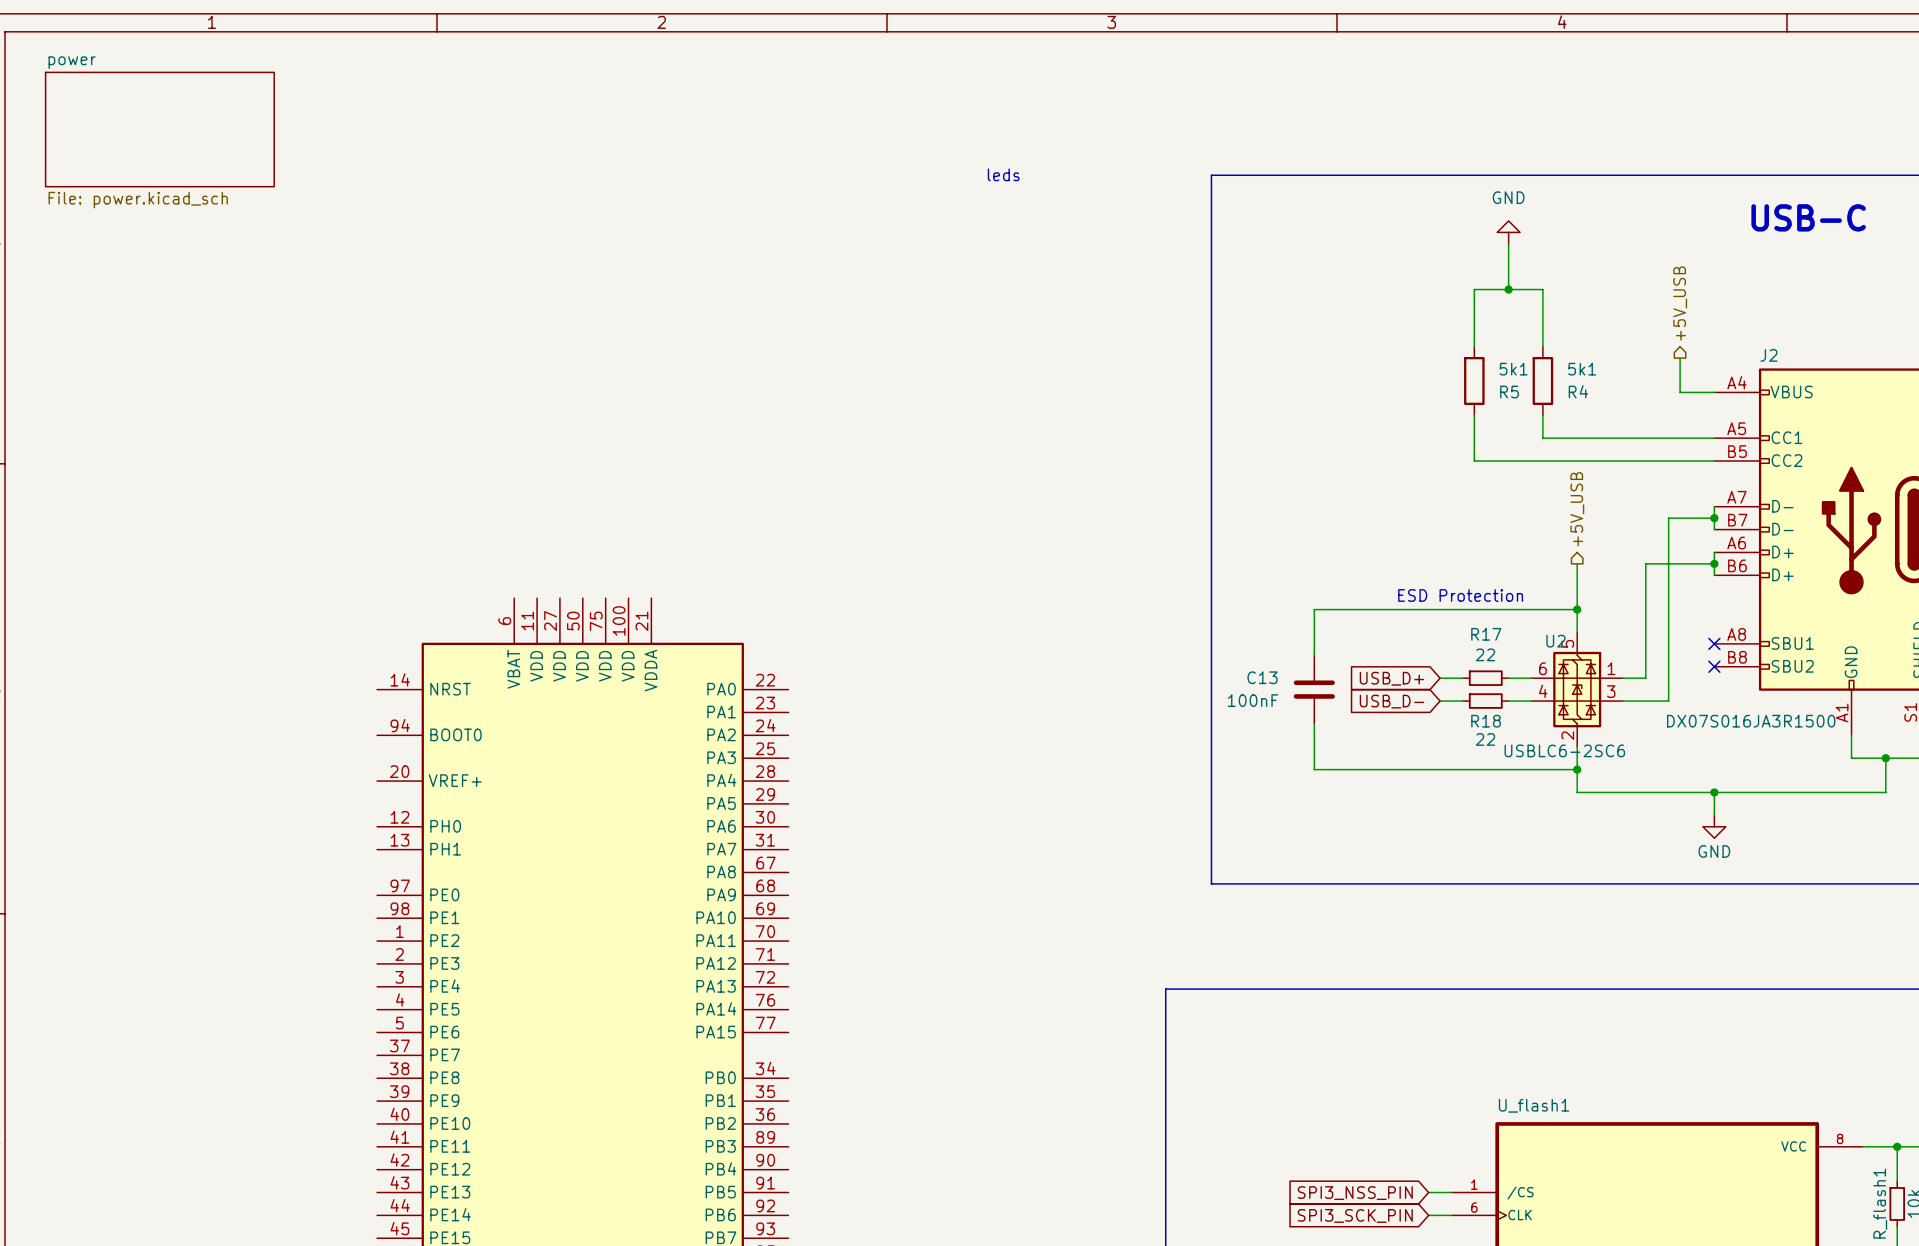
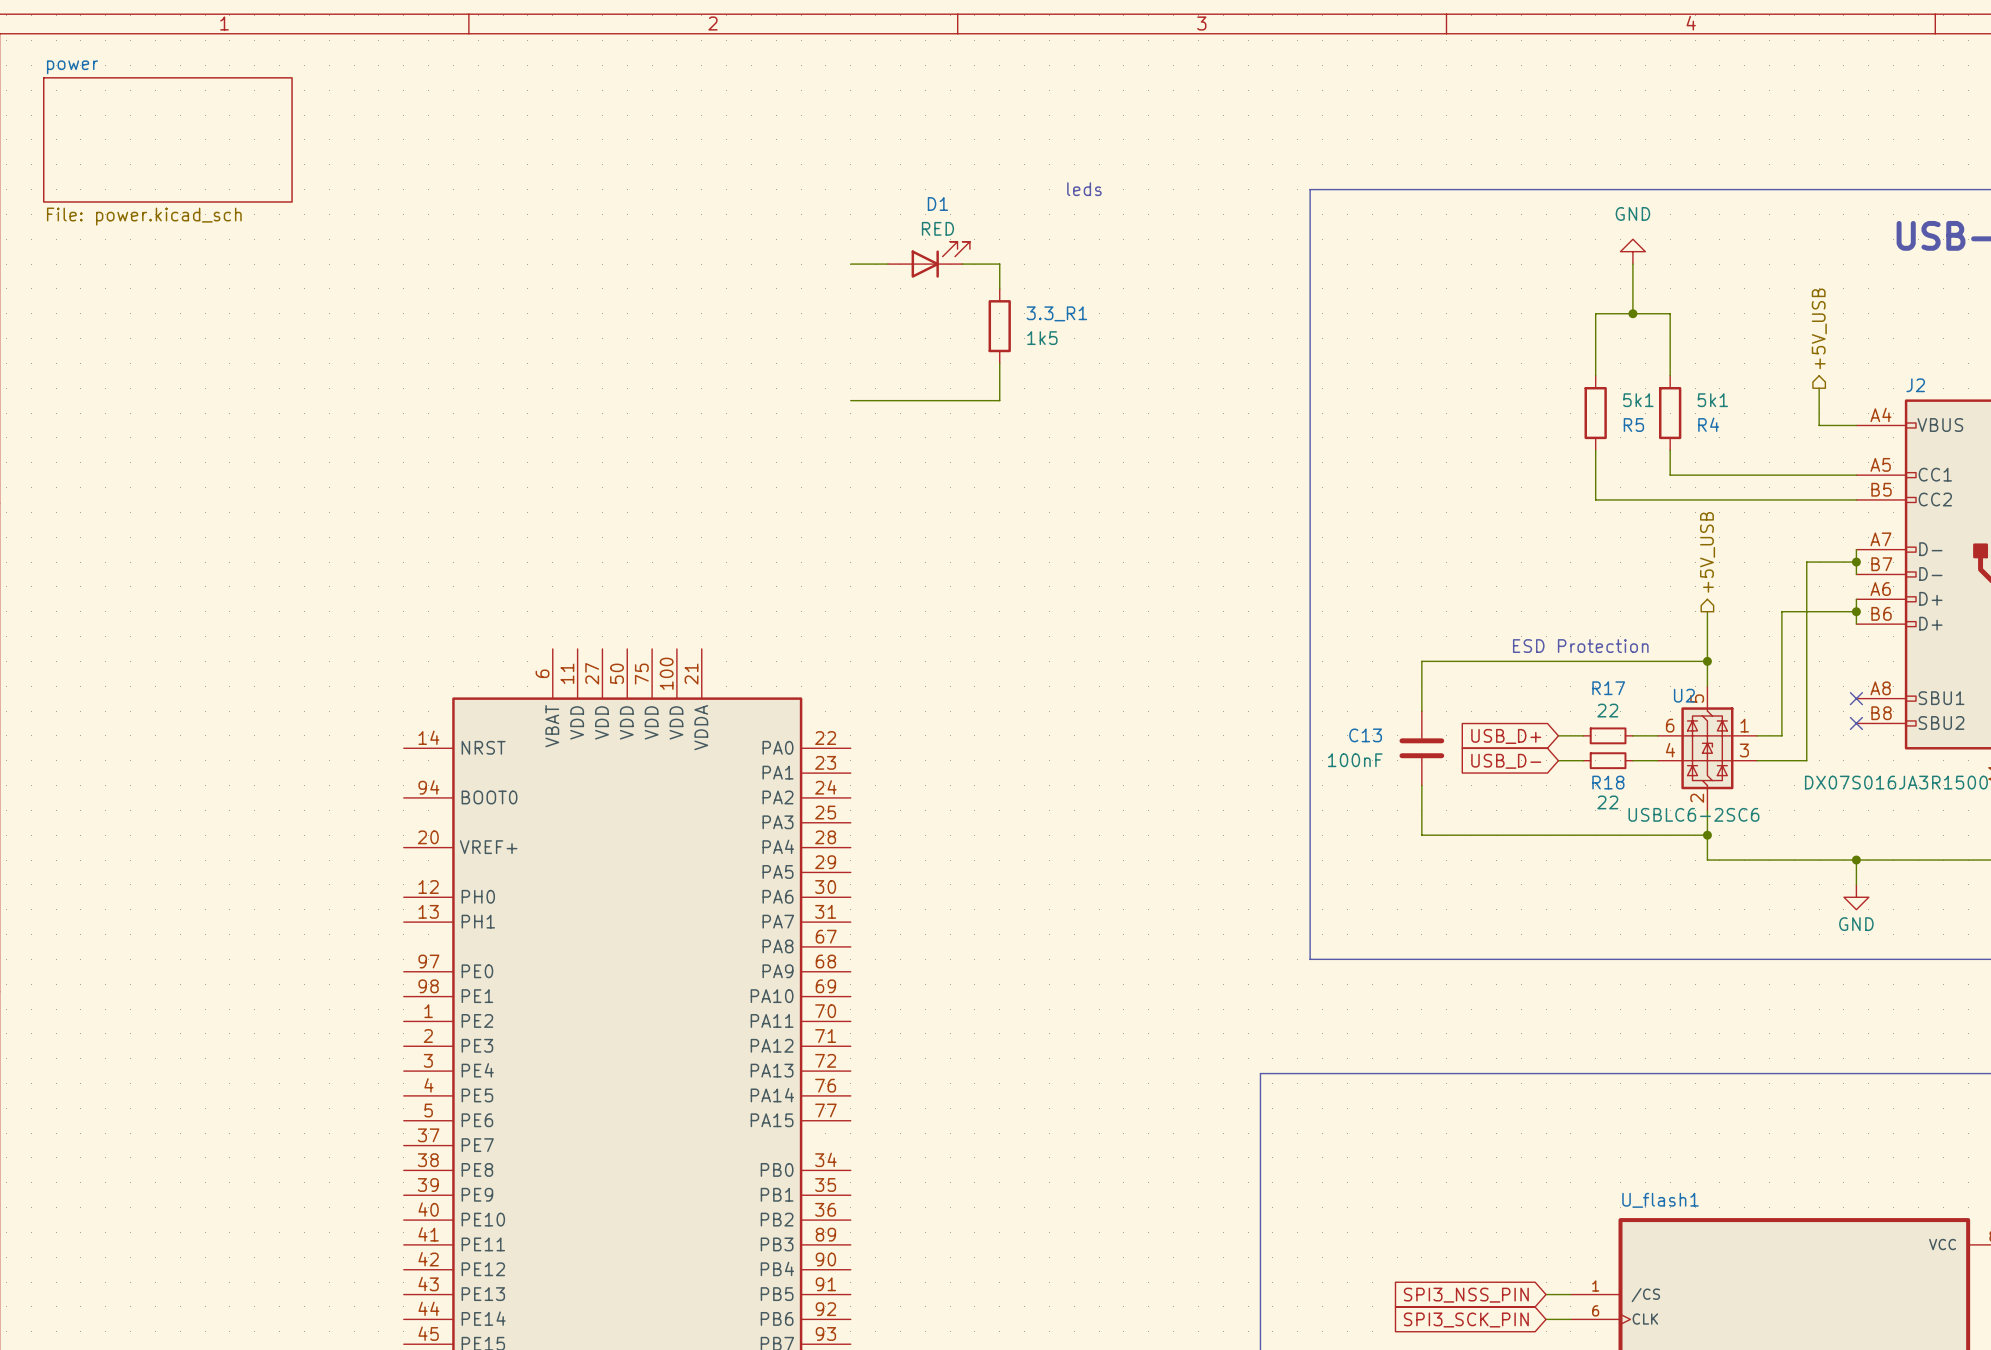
D1: none -> RED (928, 259)
wire: none -> (850, 264) (887, 264)
wire: none -> (962, 264) (999, 264) (999, 288)
3.3_R1: none -> 1k5 (999, 326)
wire: none -> (999, 363) (999, 400) (850, 400)

